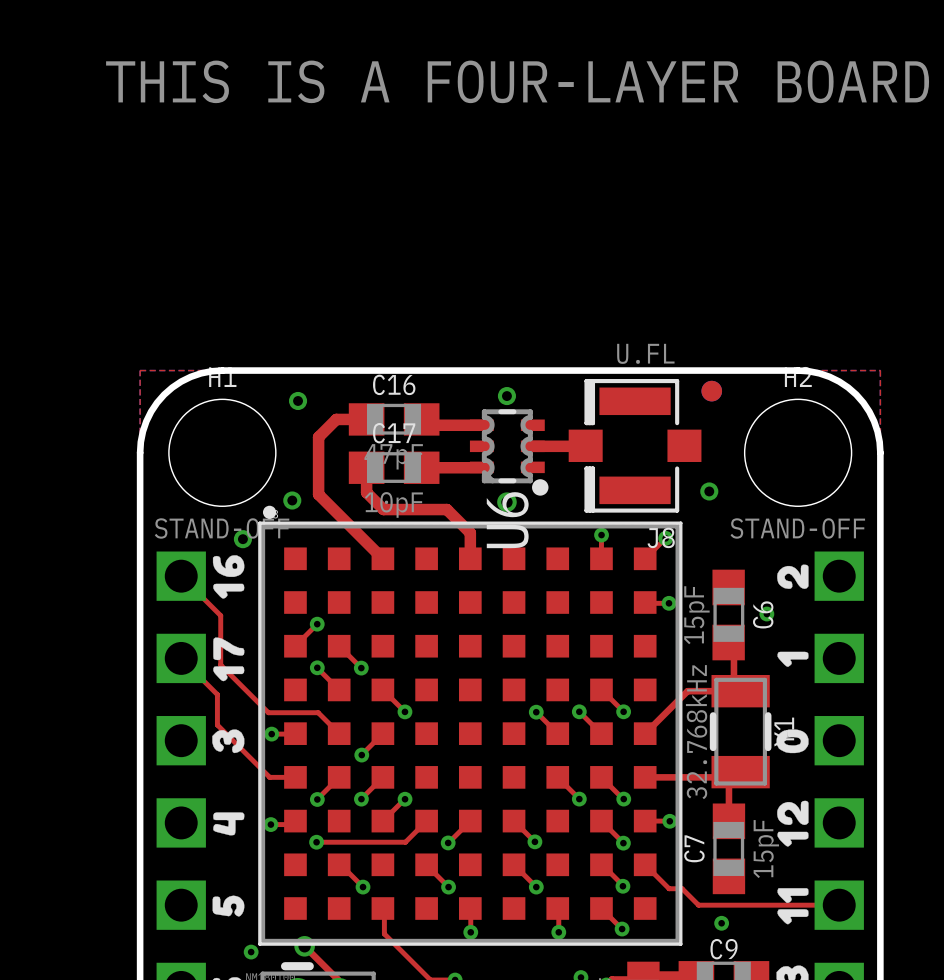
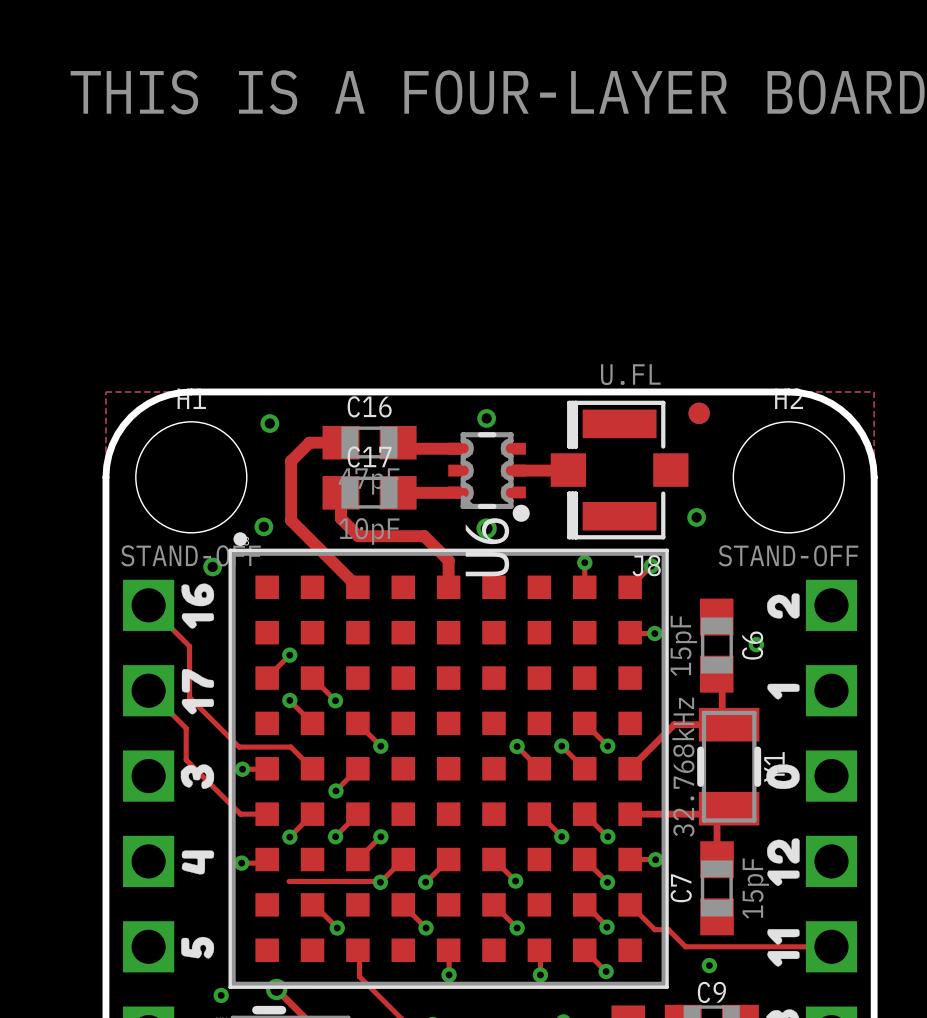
via position: (316, 842) -> (380, 882)

